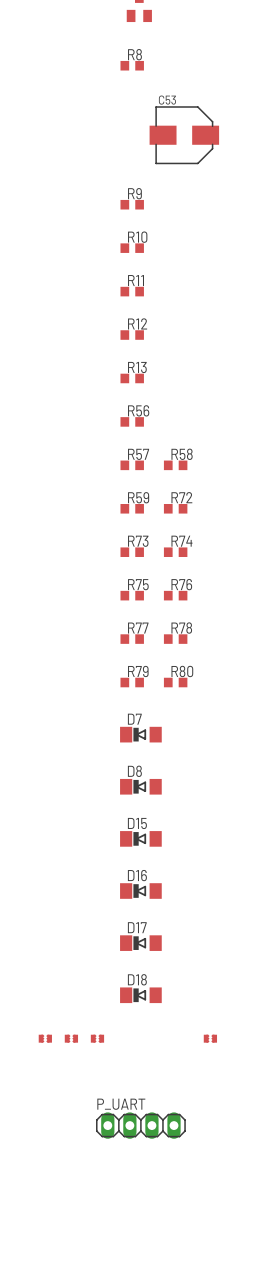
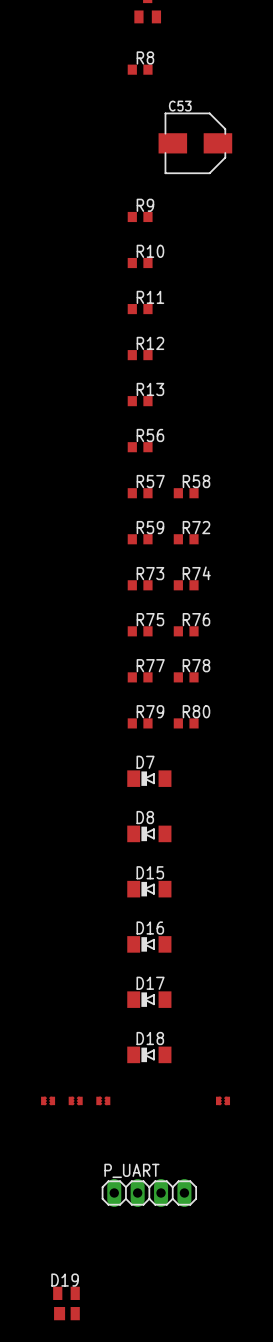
D19: none -> (66, 1303)

